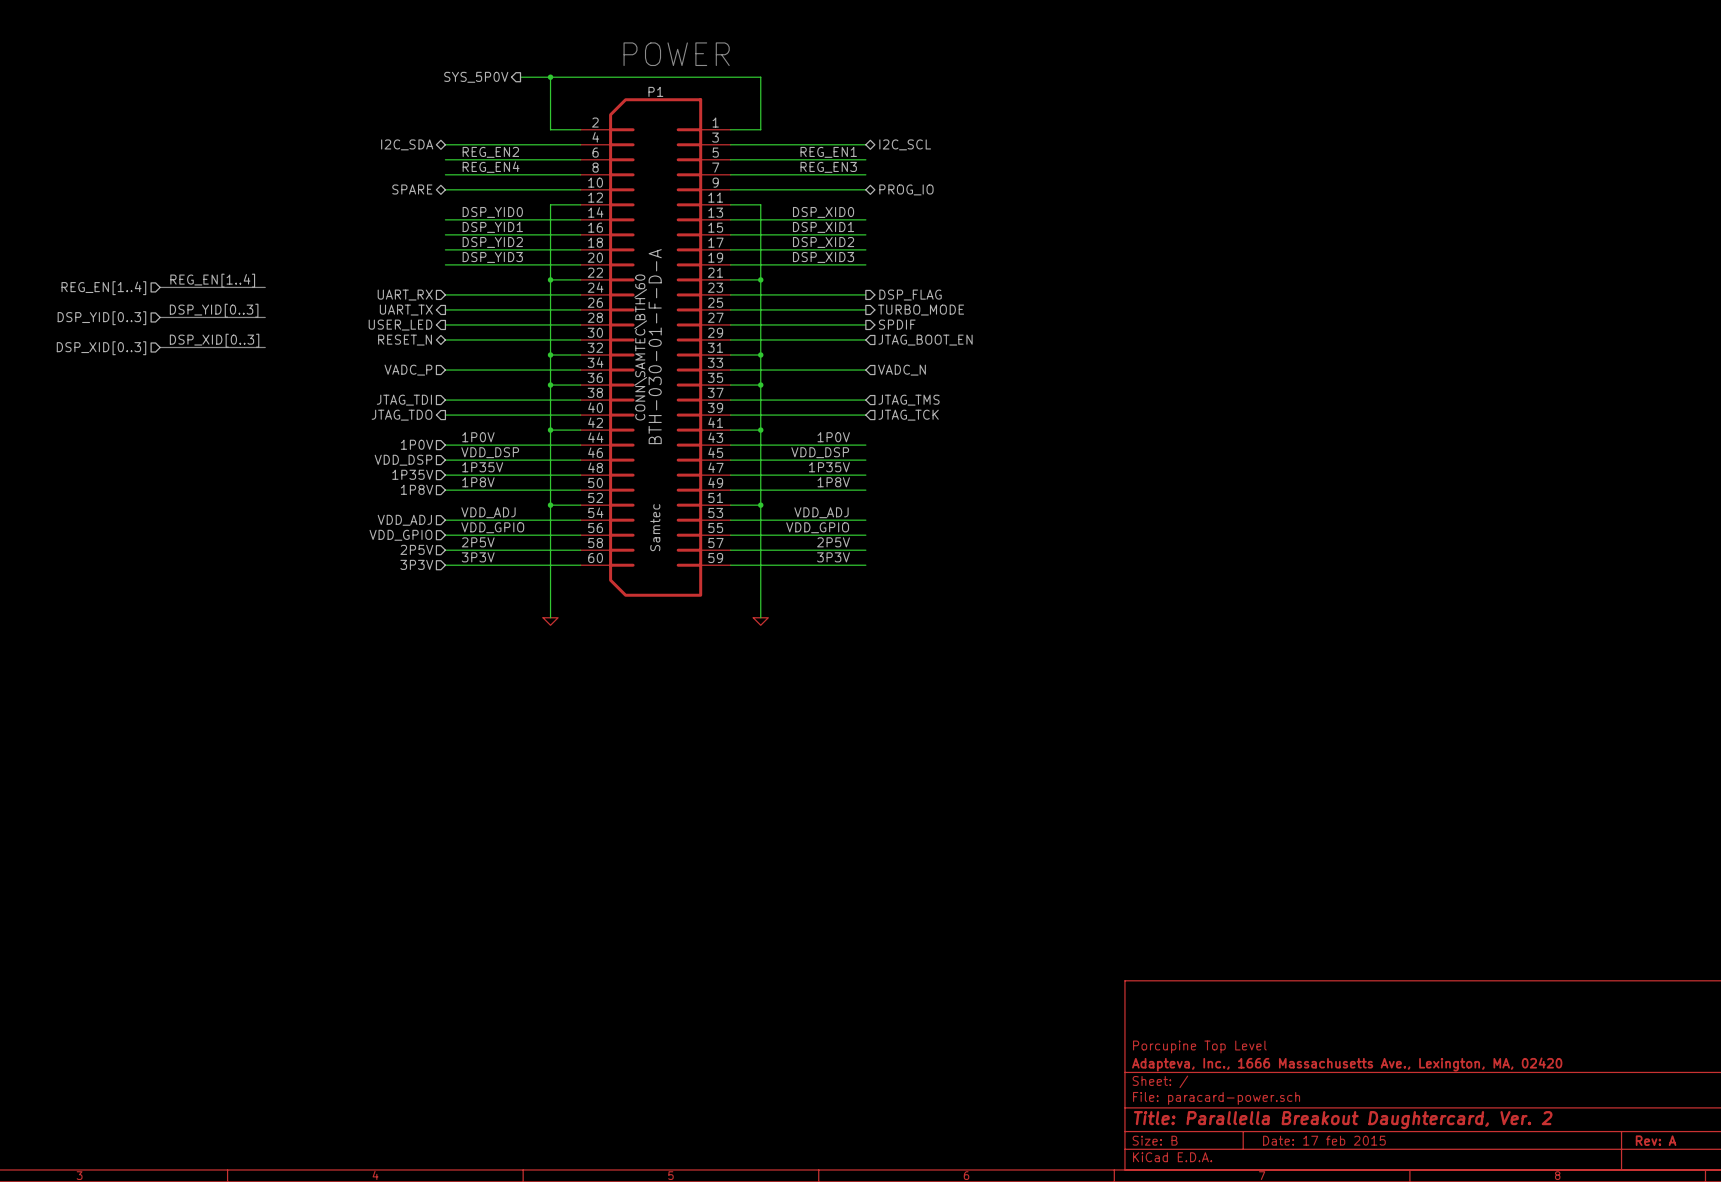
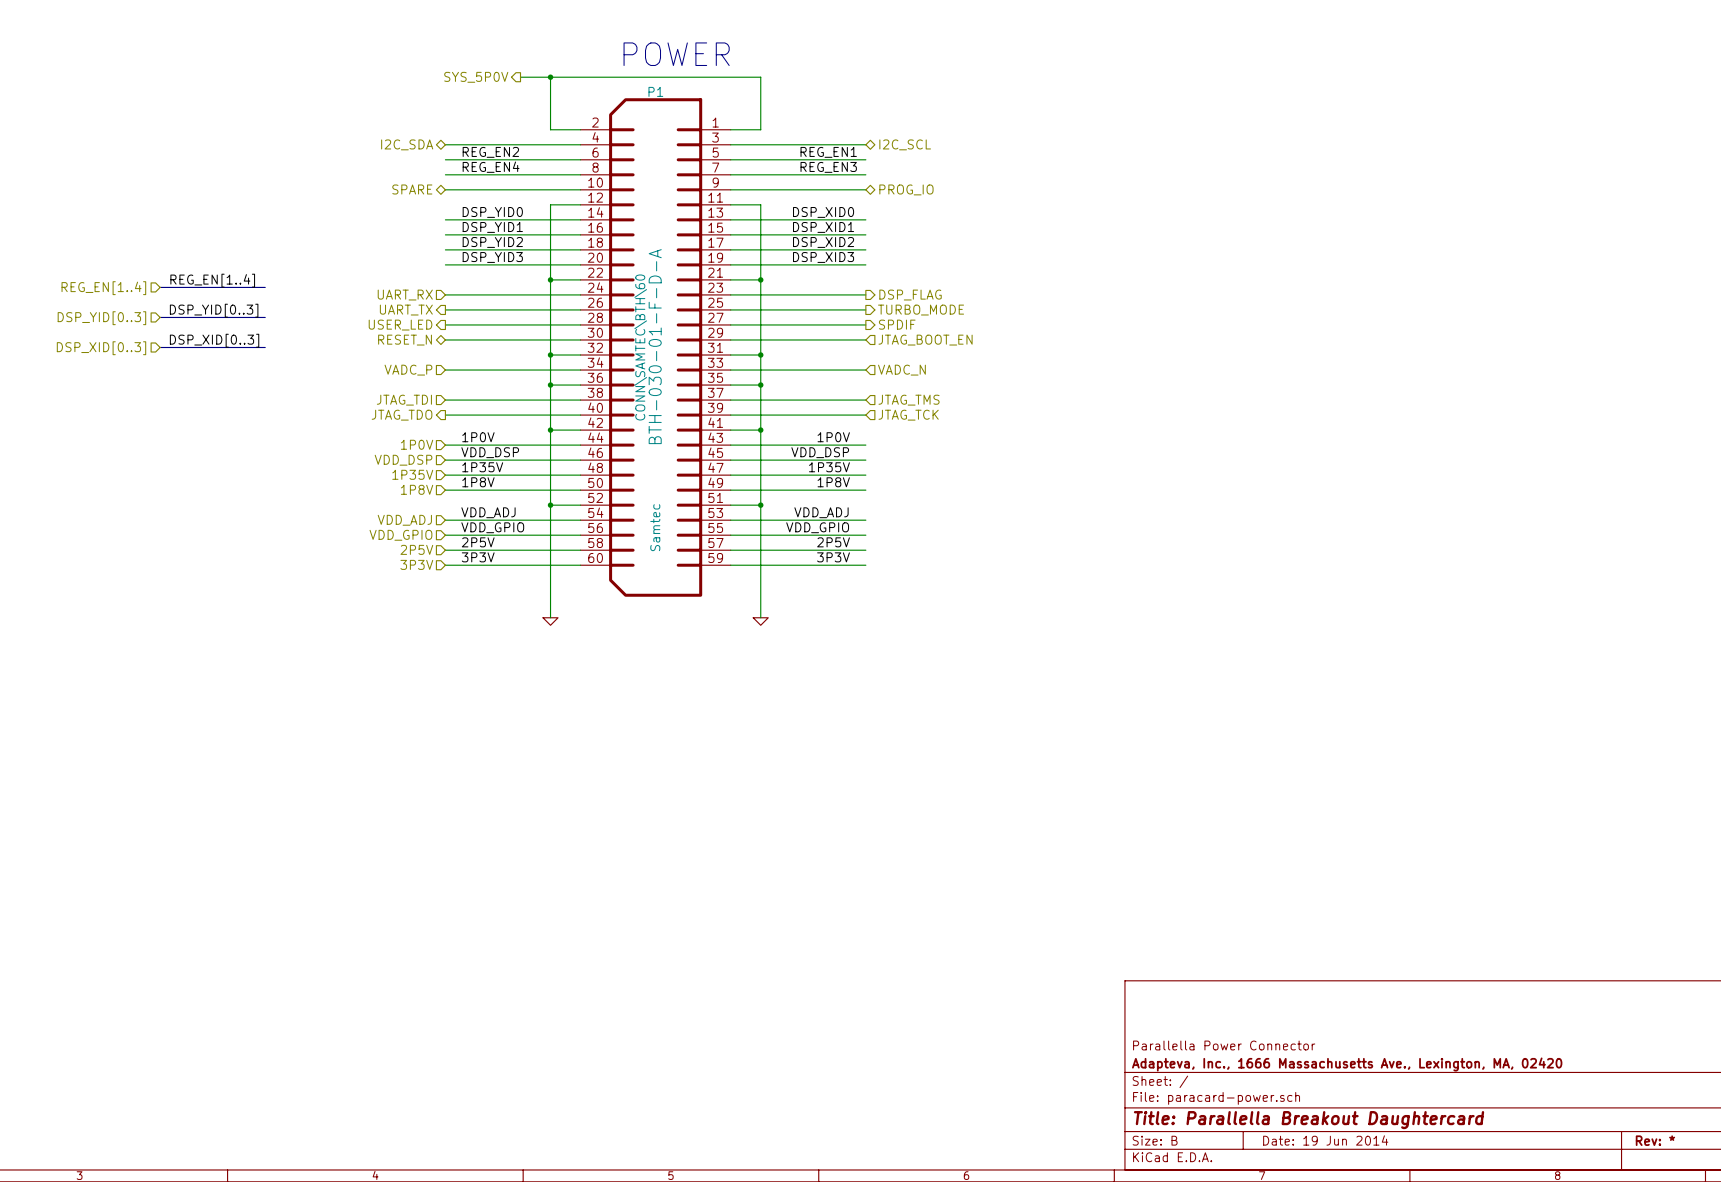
title block: Porcupine Top Level (1199, 1046) -> Parallella Power Connector (1224, 1045)
title block: Title: Parallella Breakout Daughtercard, Ver. 2 (1343, 1120) -> Title: Parallella Breakout Daughtercard (1309, 1120)
title block: Date: 17 feb 2015 (1324, 1140) -> Date: 19 Jun 2014 (1325, 1140)
title block: Rev: A (1656, 1140) -> Rev: * (1655, 1140)

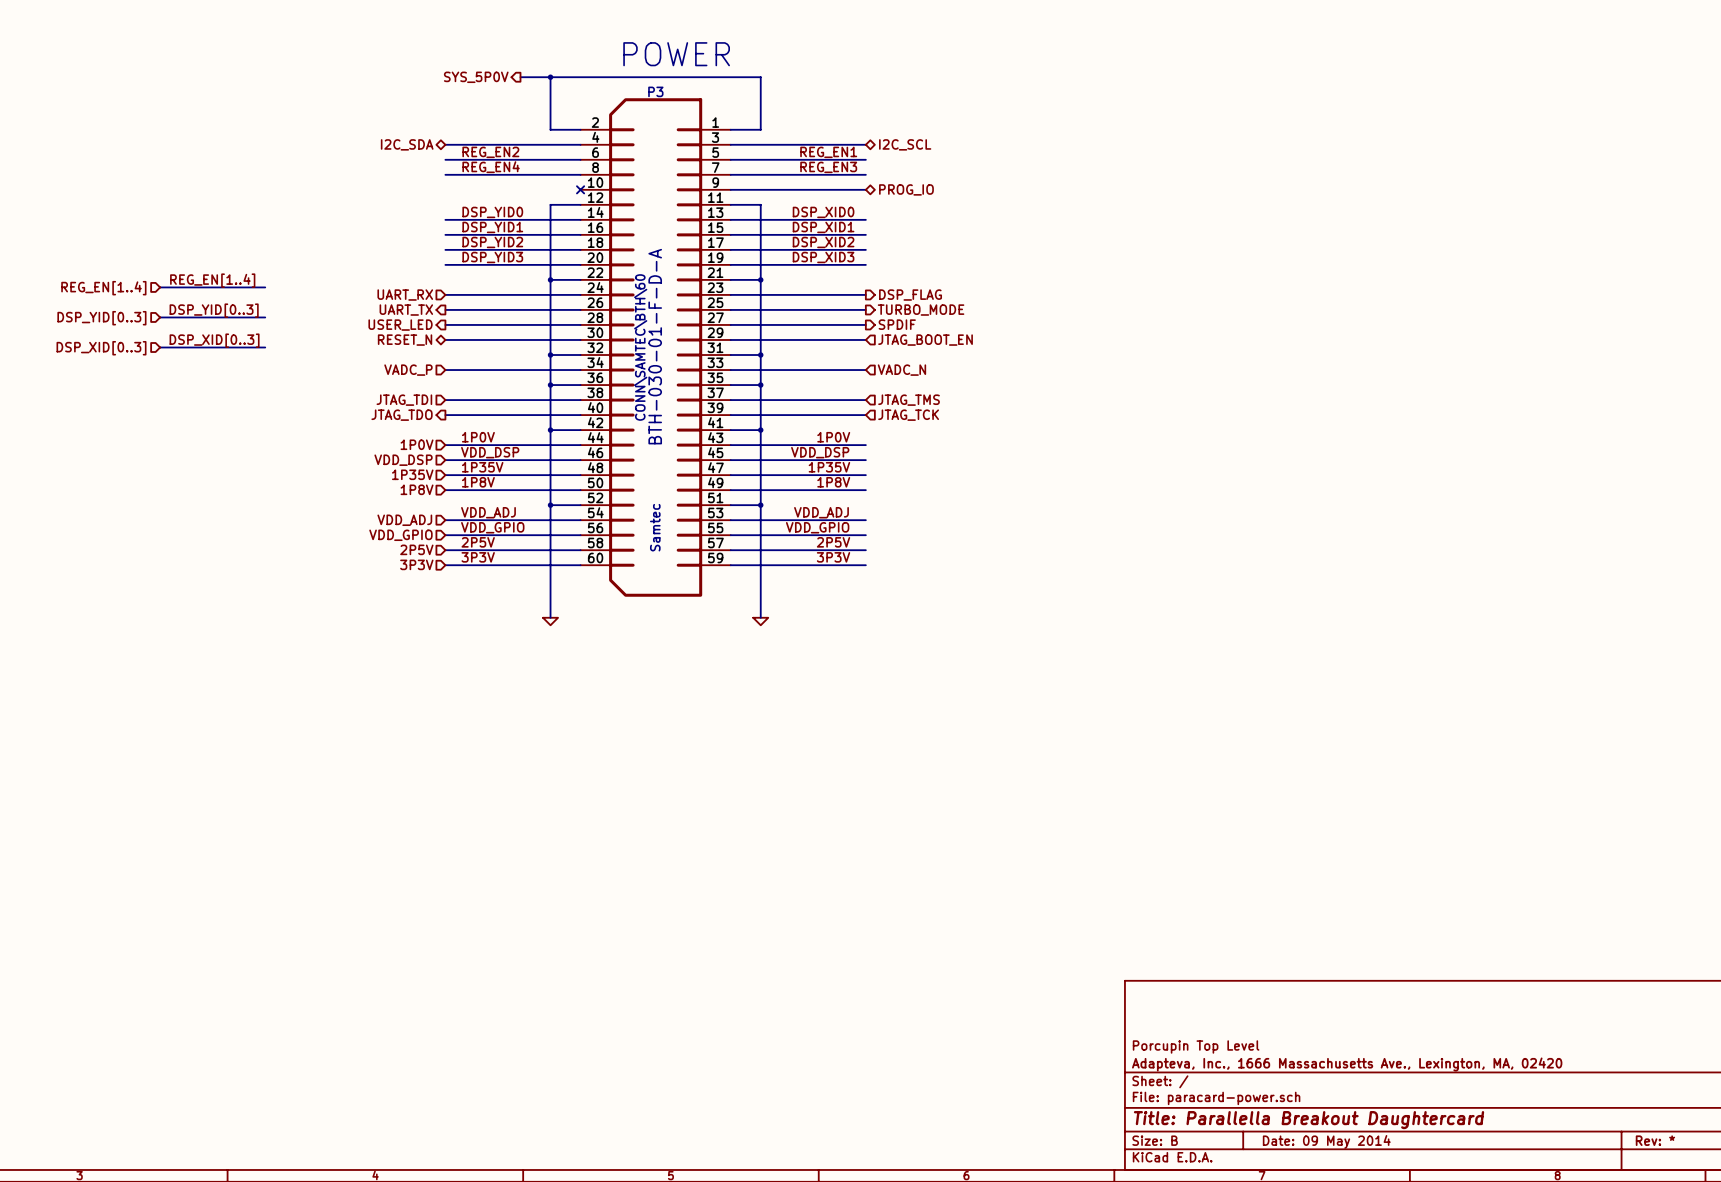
P1 name: P1 (655, 91) -> P3 (655, 91)
hierarchical label: SPARE (412, 189) -> none
wire: (445, 189) (580, 189) -> none
no-connect mark: none -> (580, 189)
title block: Parallella Power Connector (1224, 1045) -> Porcupin Top Level (1196, 1046)
title block: Date: 19 Jun 2014 (1325, 1140) -> Date: 09 May 2014 (1326, 1141)

